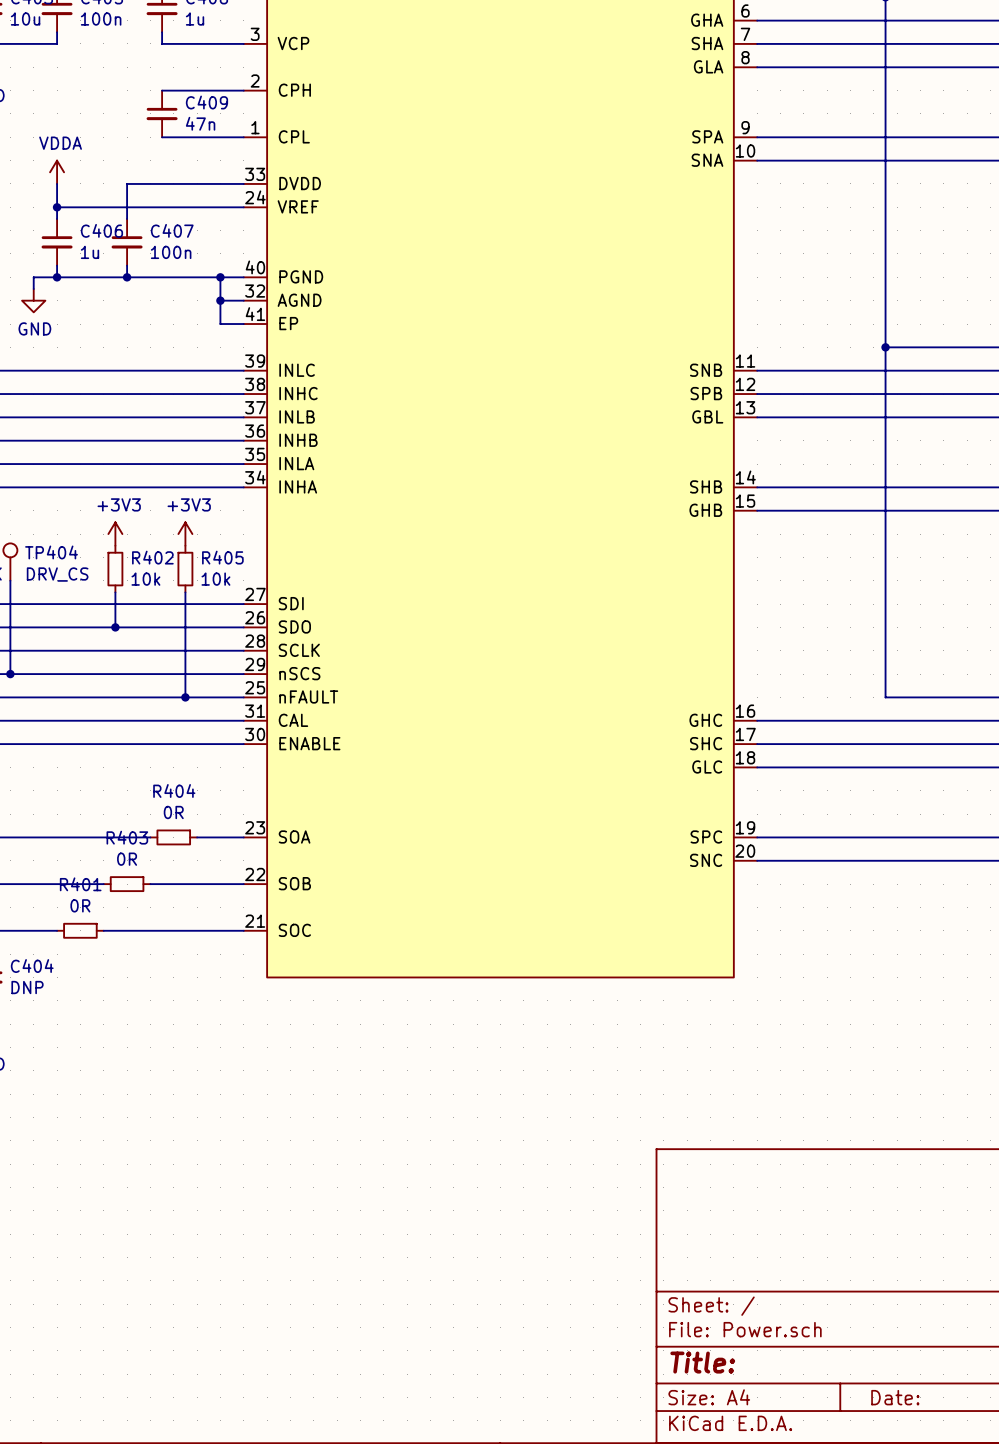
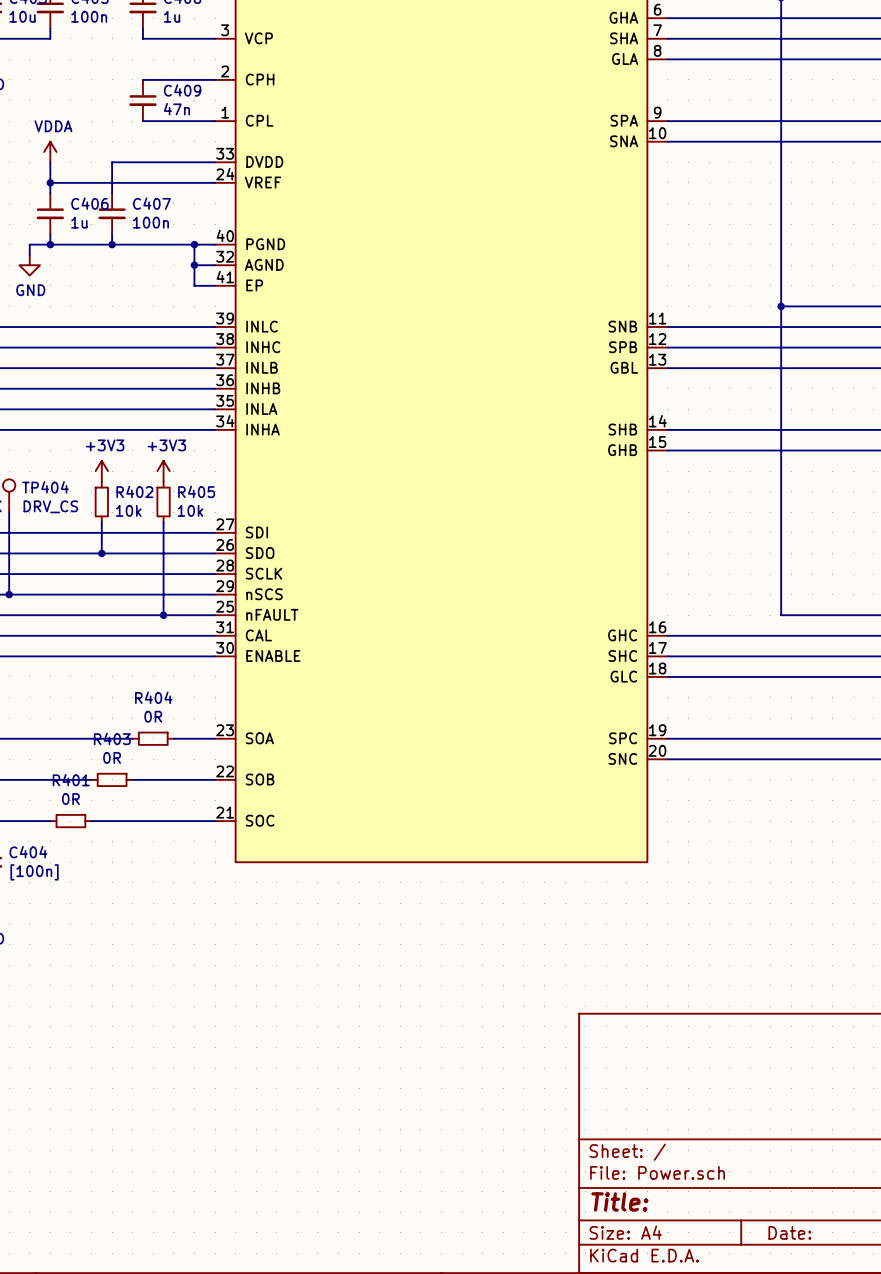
C404 value: DNP (27, 987) -> [100n] (34, 872)

